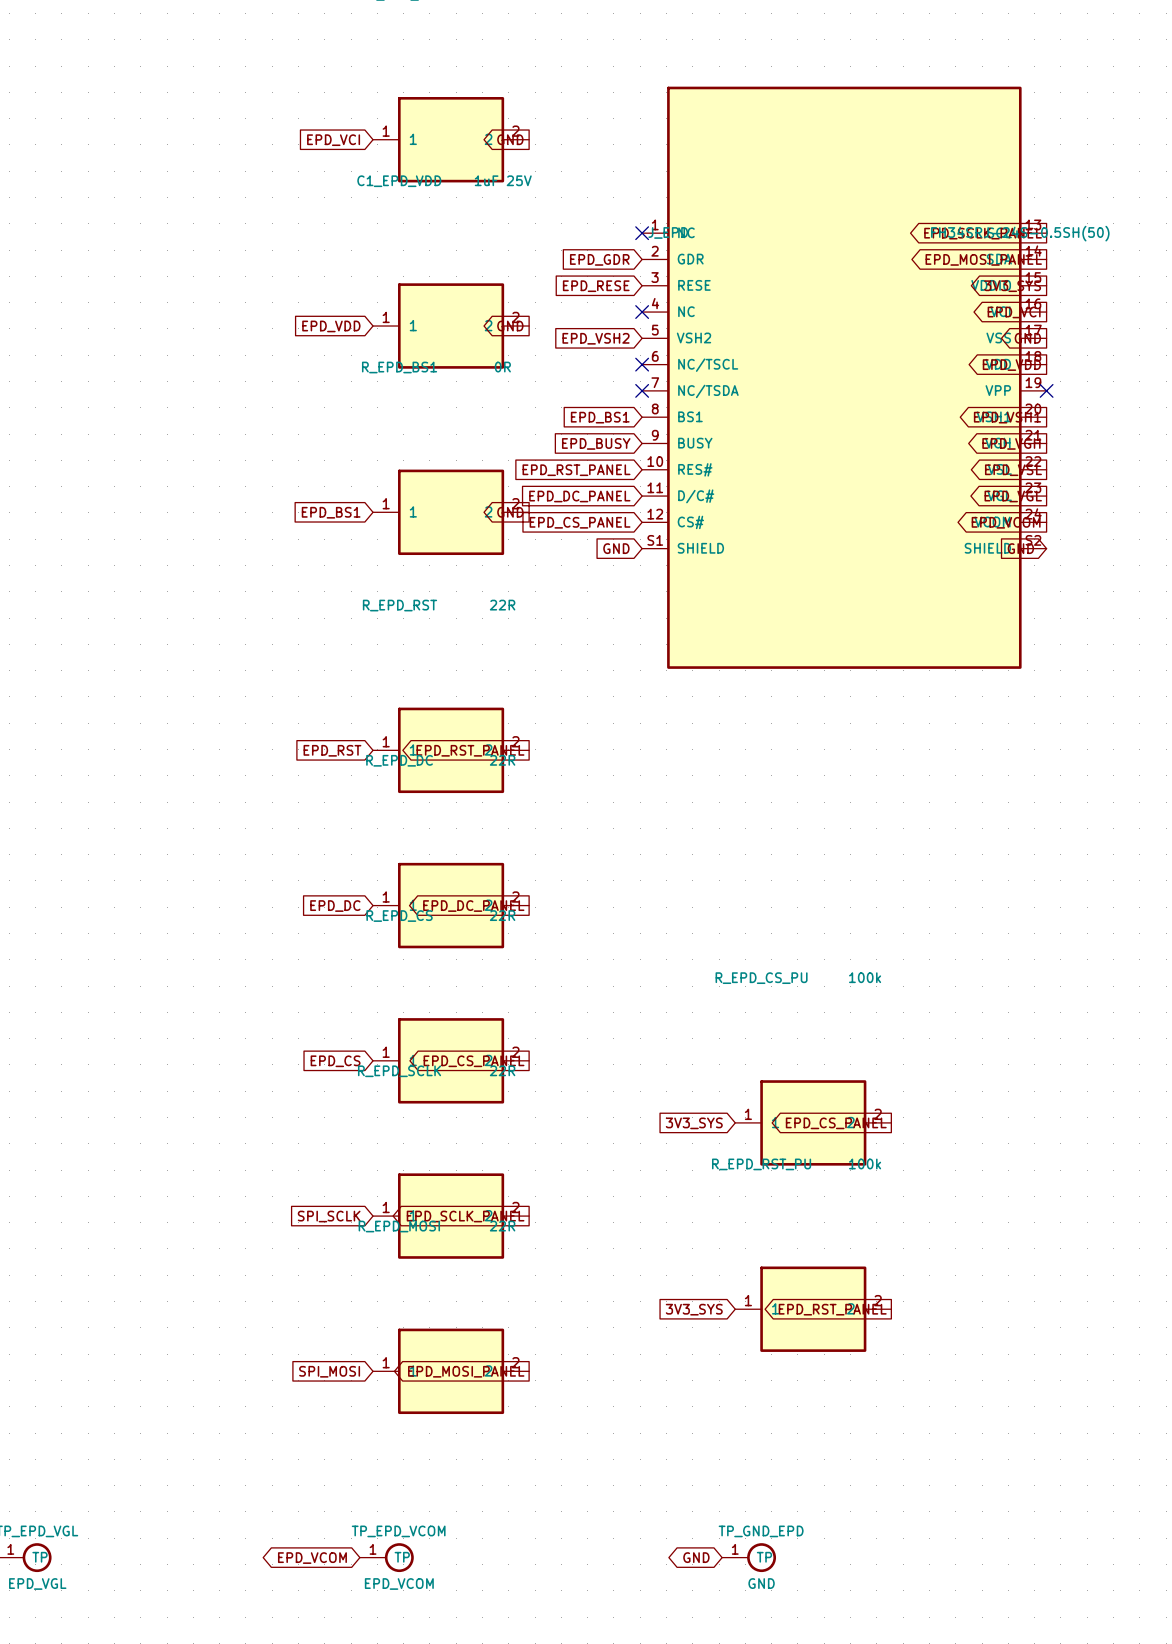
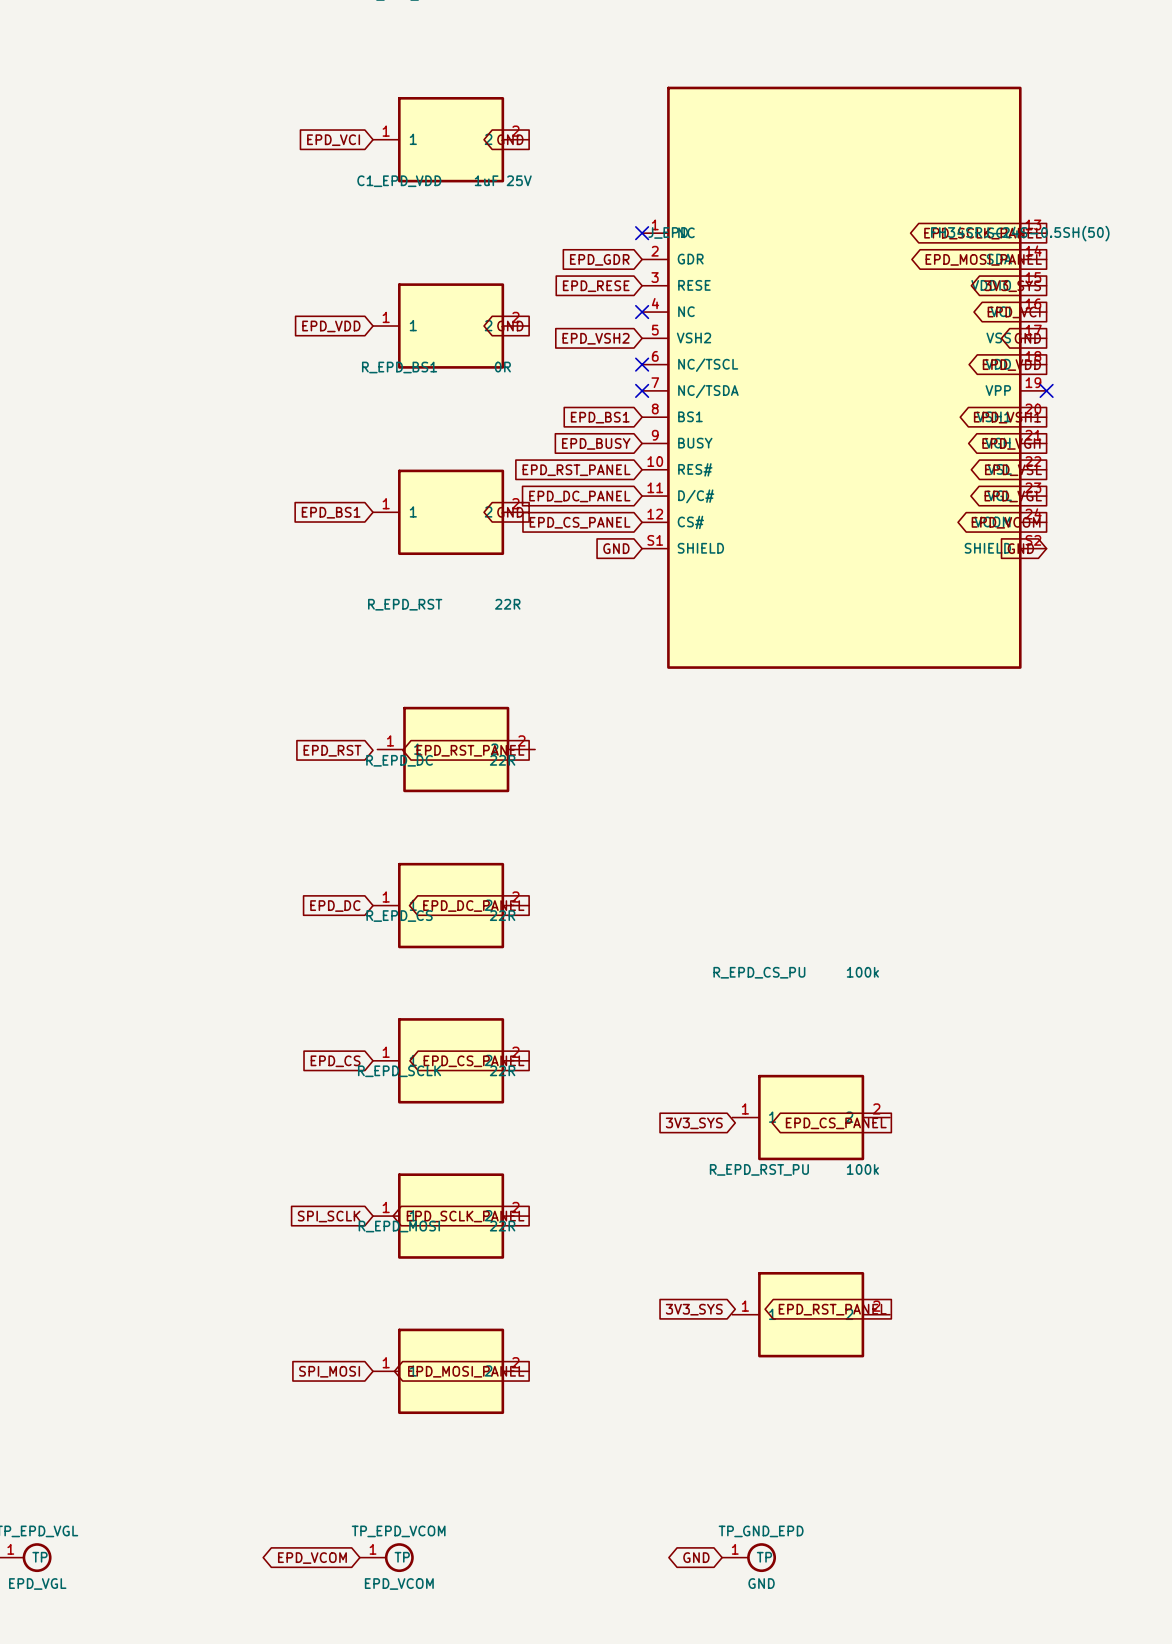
R_EPD_RST symbol: [373, 707, 530, 794] -> [377, 706, 536, 793]
R_EPD_CS_PU symbol: [735, 1080, 892, 1166] -> [732, 1074, 891, 1161]
R_EPD_RST_PU symbol: [735, 1266, 892, 1352] -> [732, 1271, 891, 1358]

